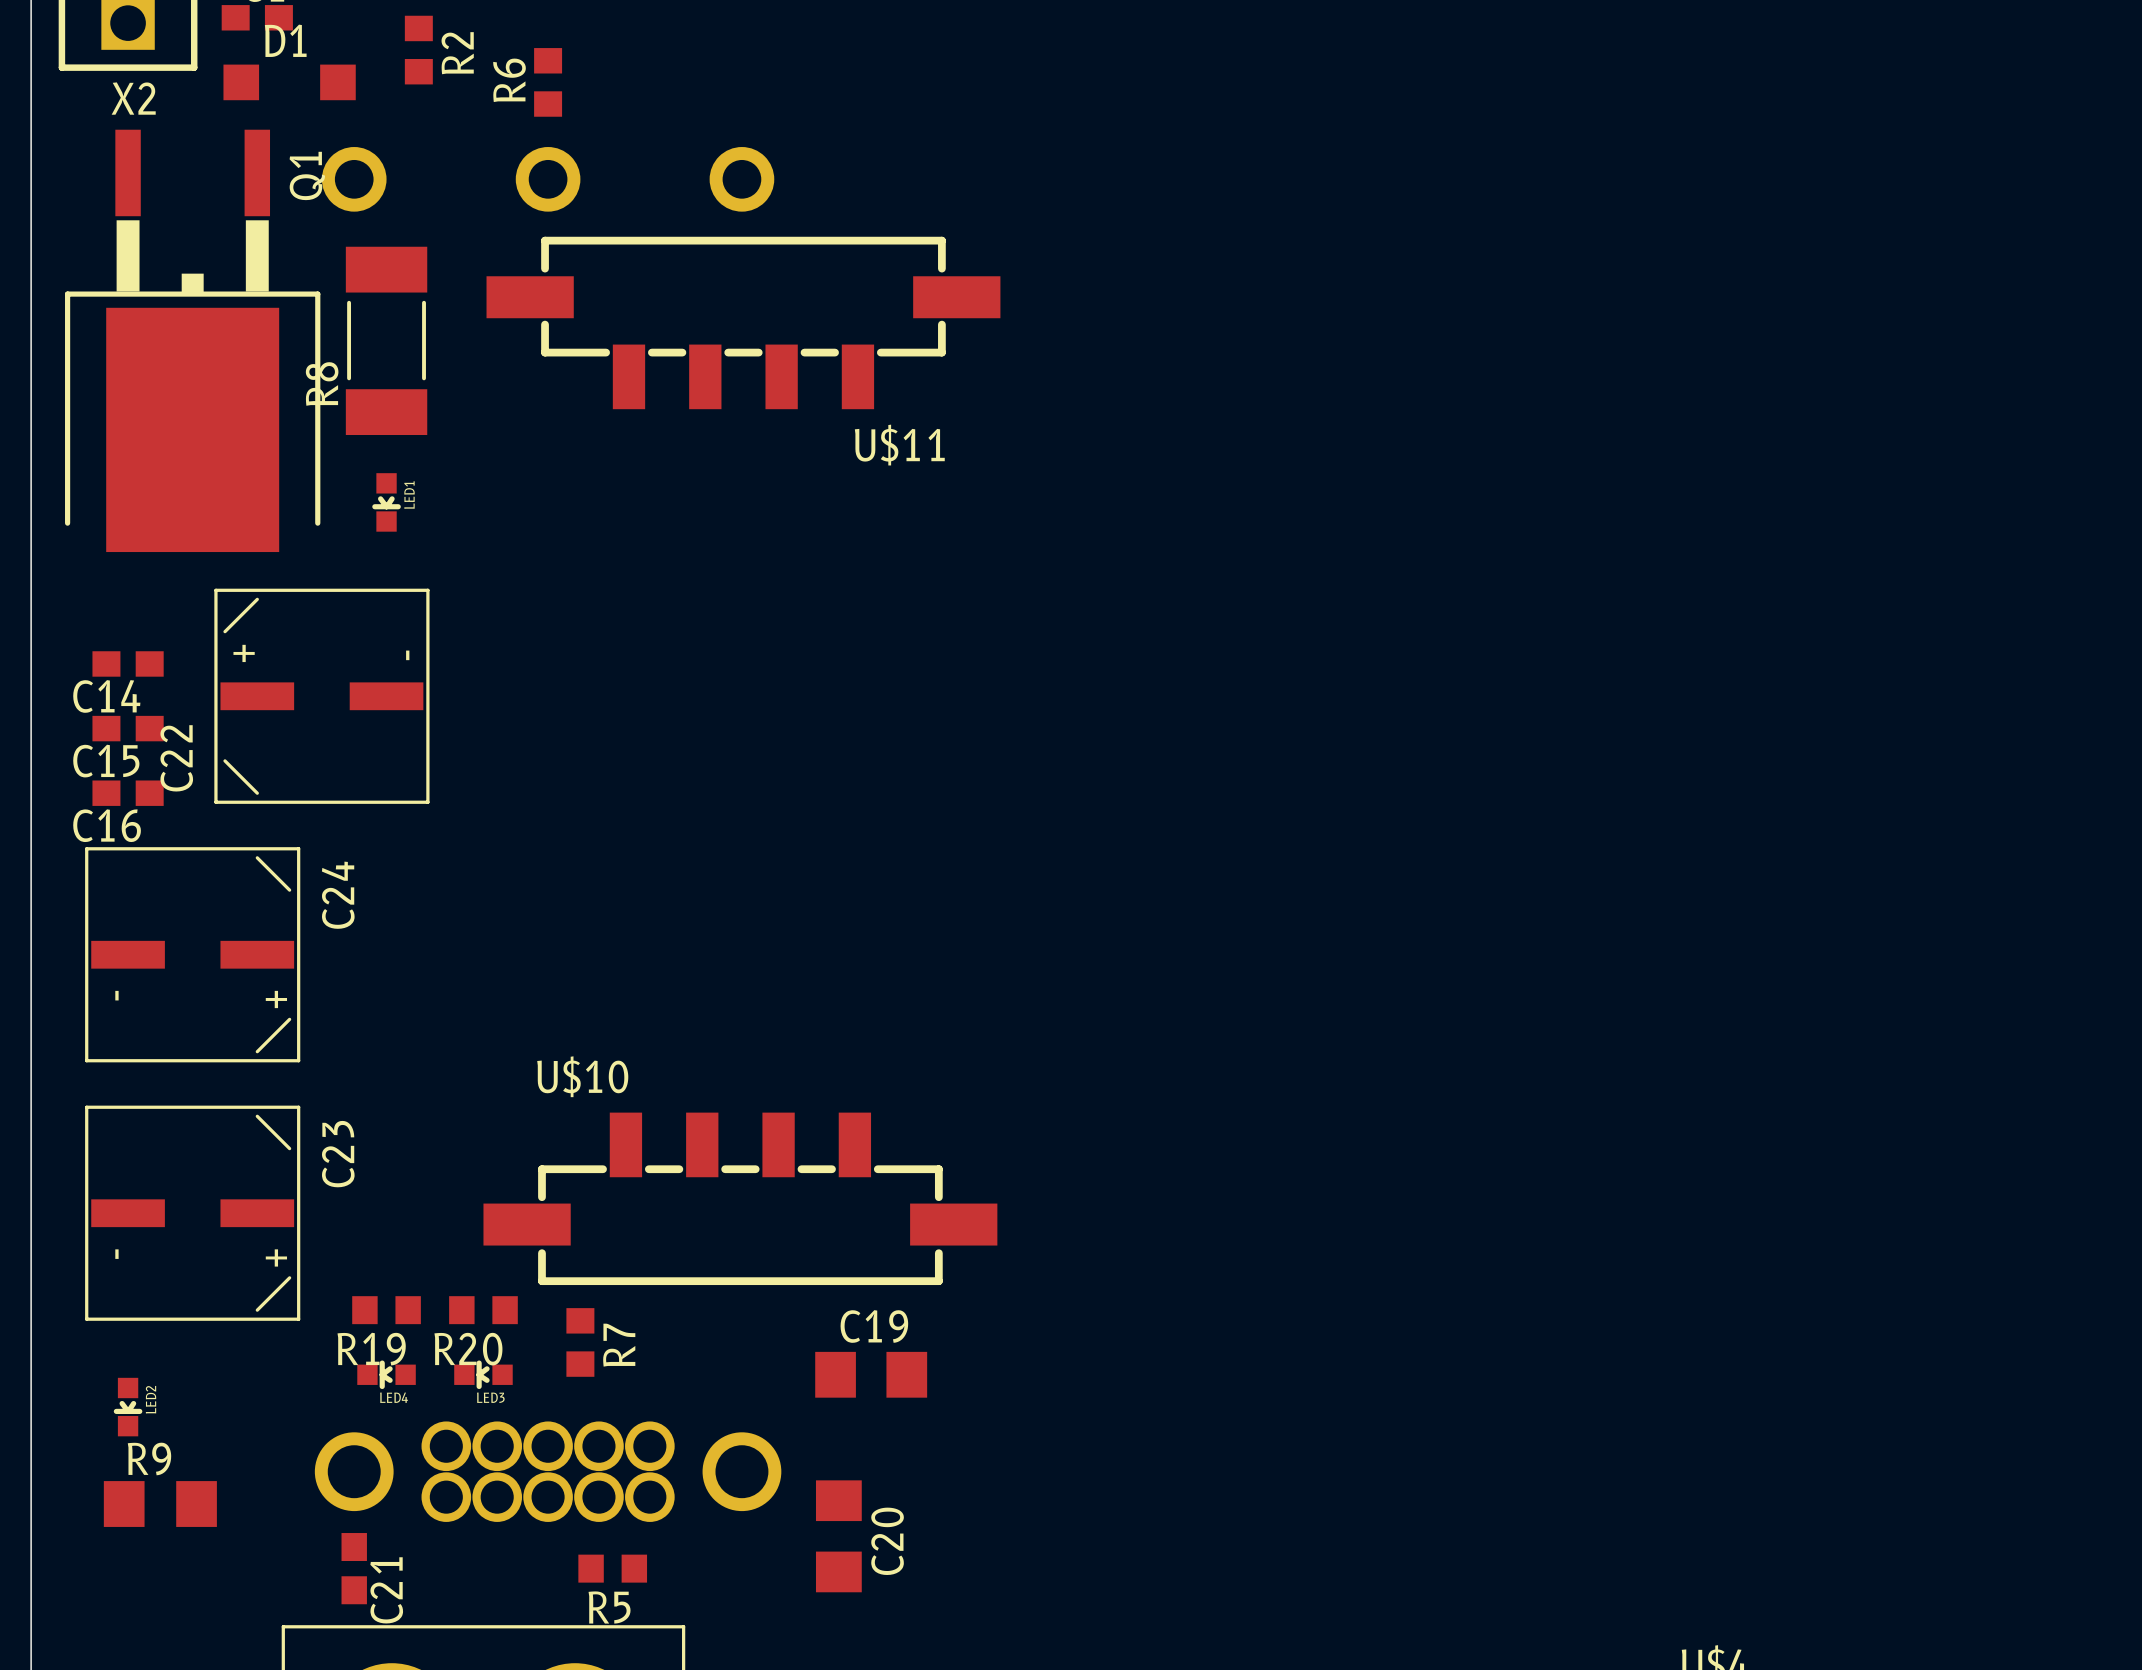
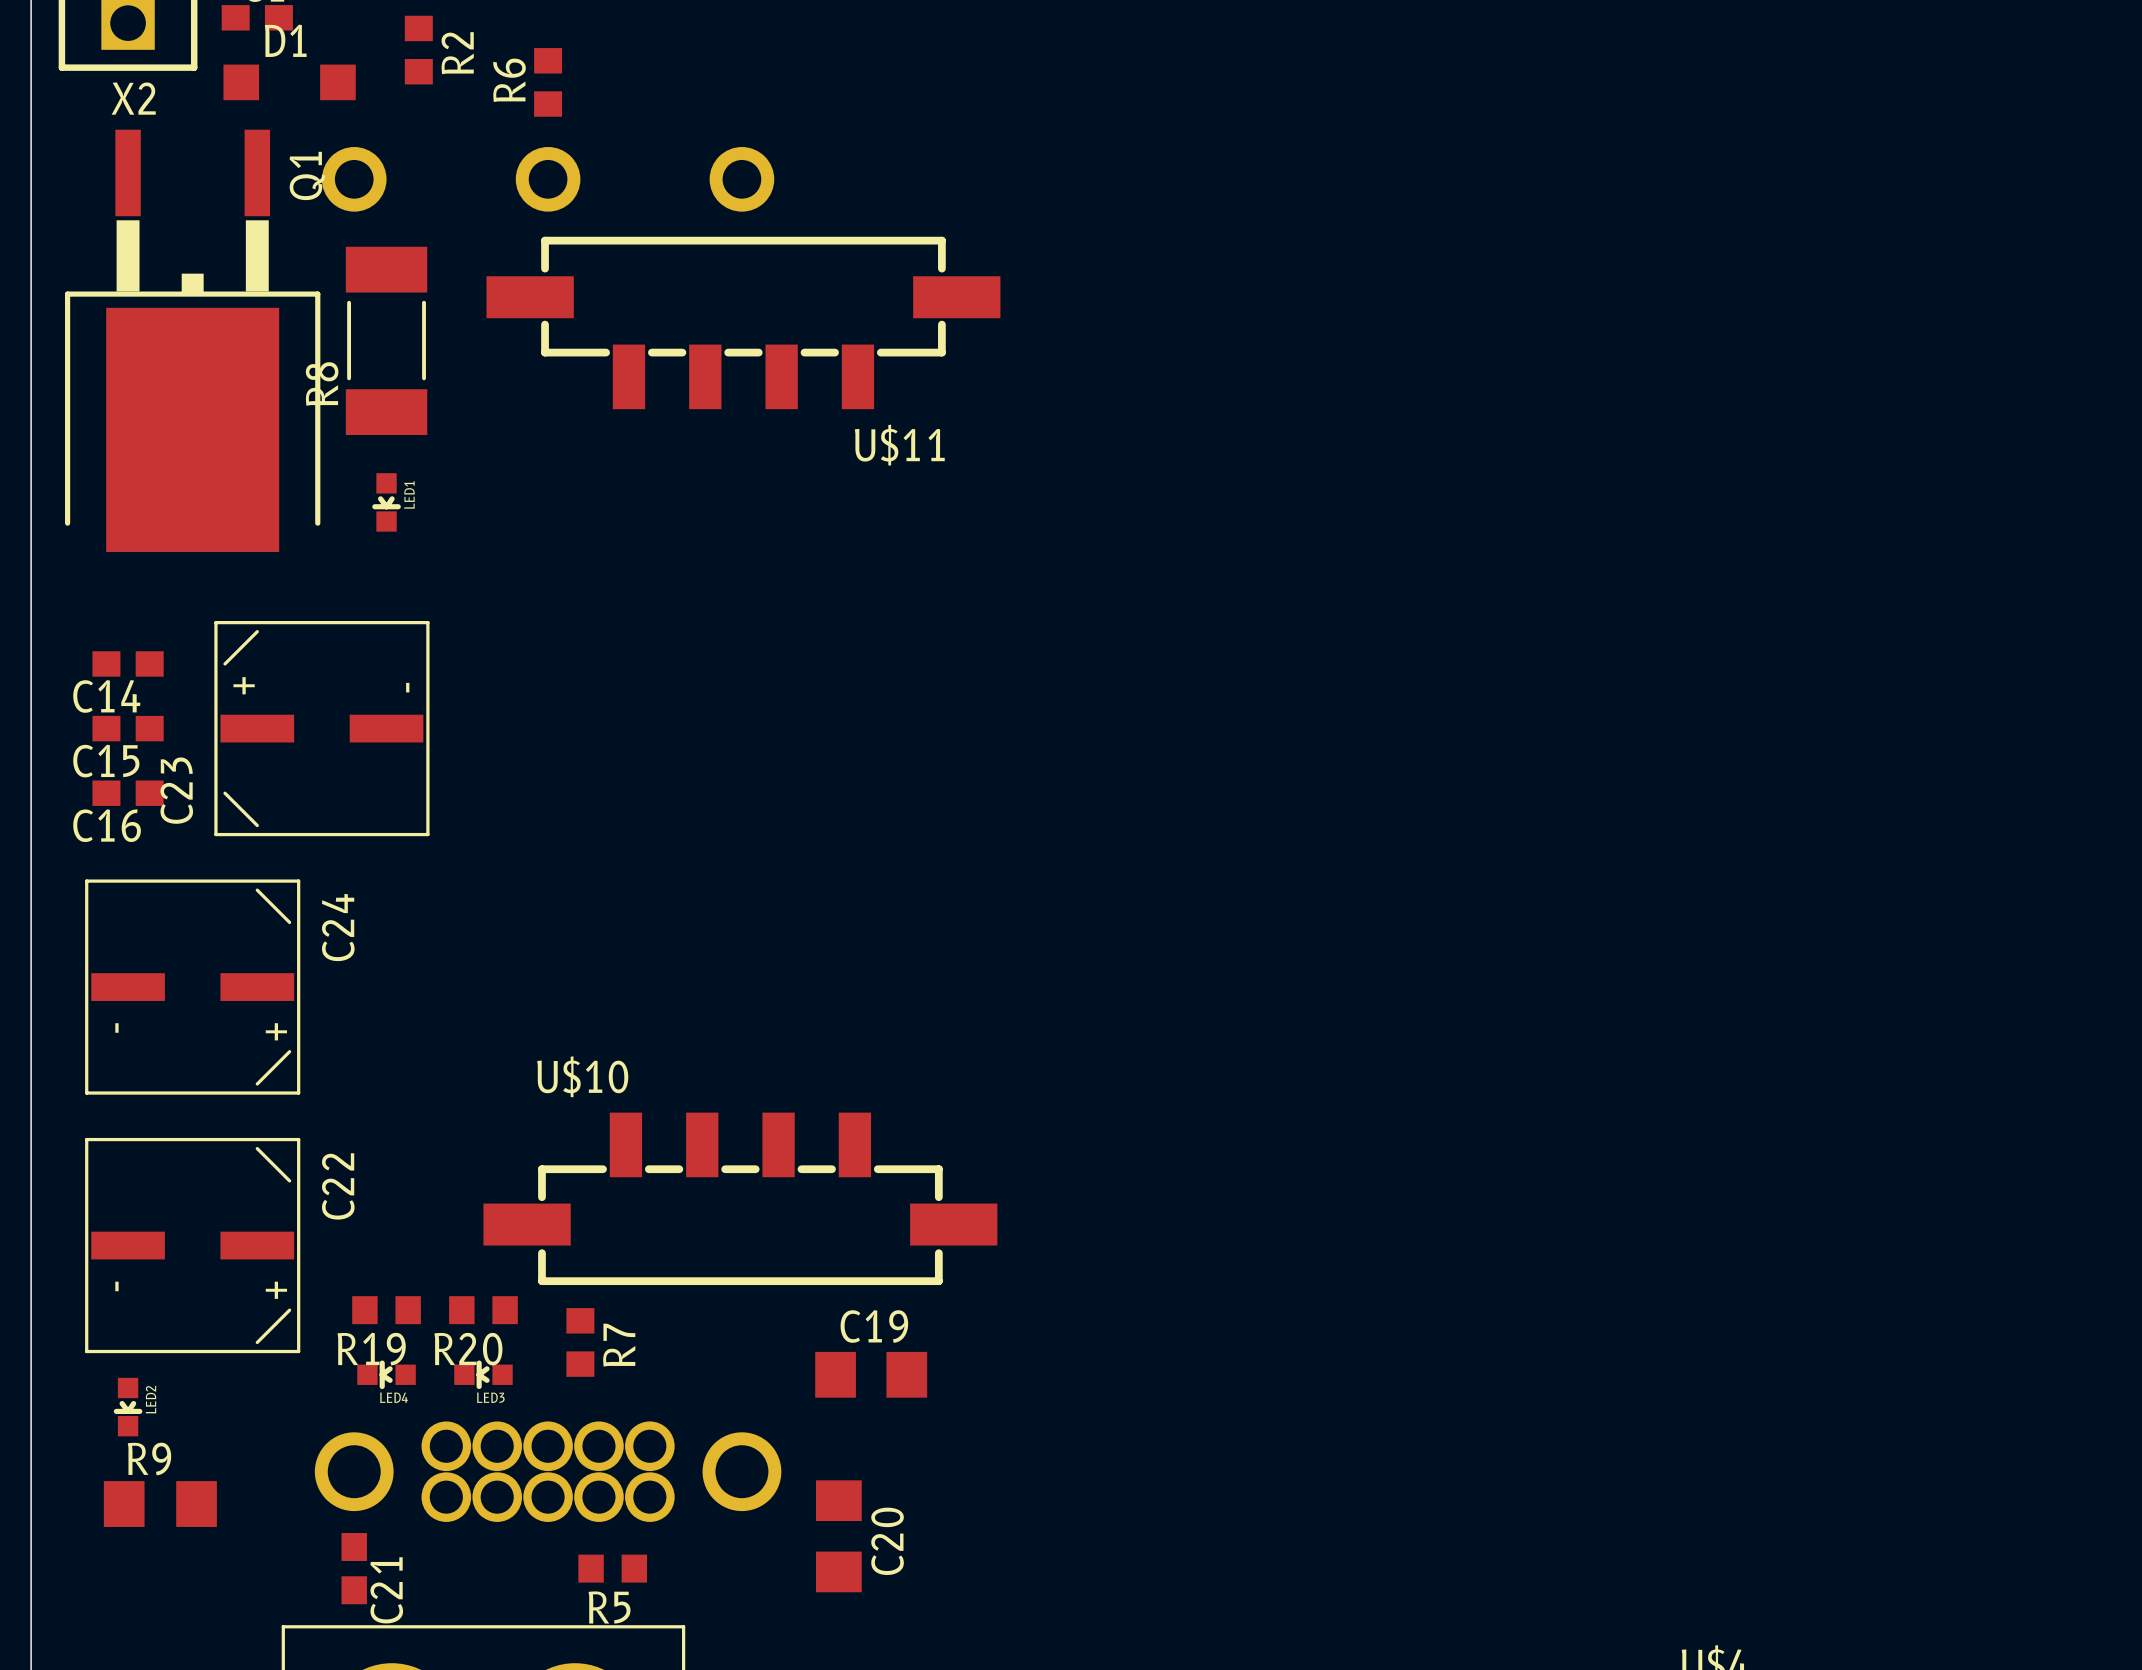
C22 footprint: [214, 588, 430, 804] -> [85, 1137, 301, 1354]
C22 name position: C22 (176, 758) -> C22 (338, 1186)
C24 position: (192, 954) -> (192, 987)
C23 footprint: [85, 1105, 301, 1321] -> [214, 621, 430, 837]
C23 name position: C23 (338, 1154) -> C23 (176, 790)

